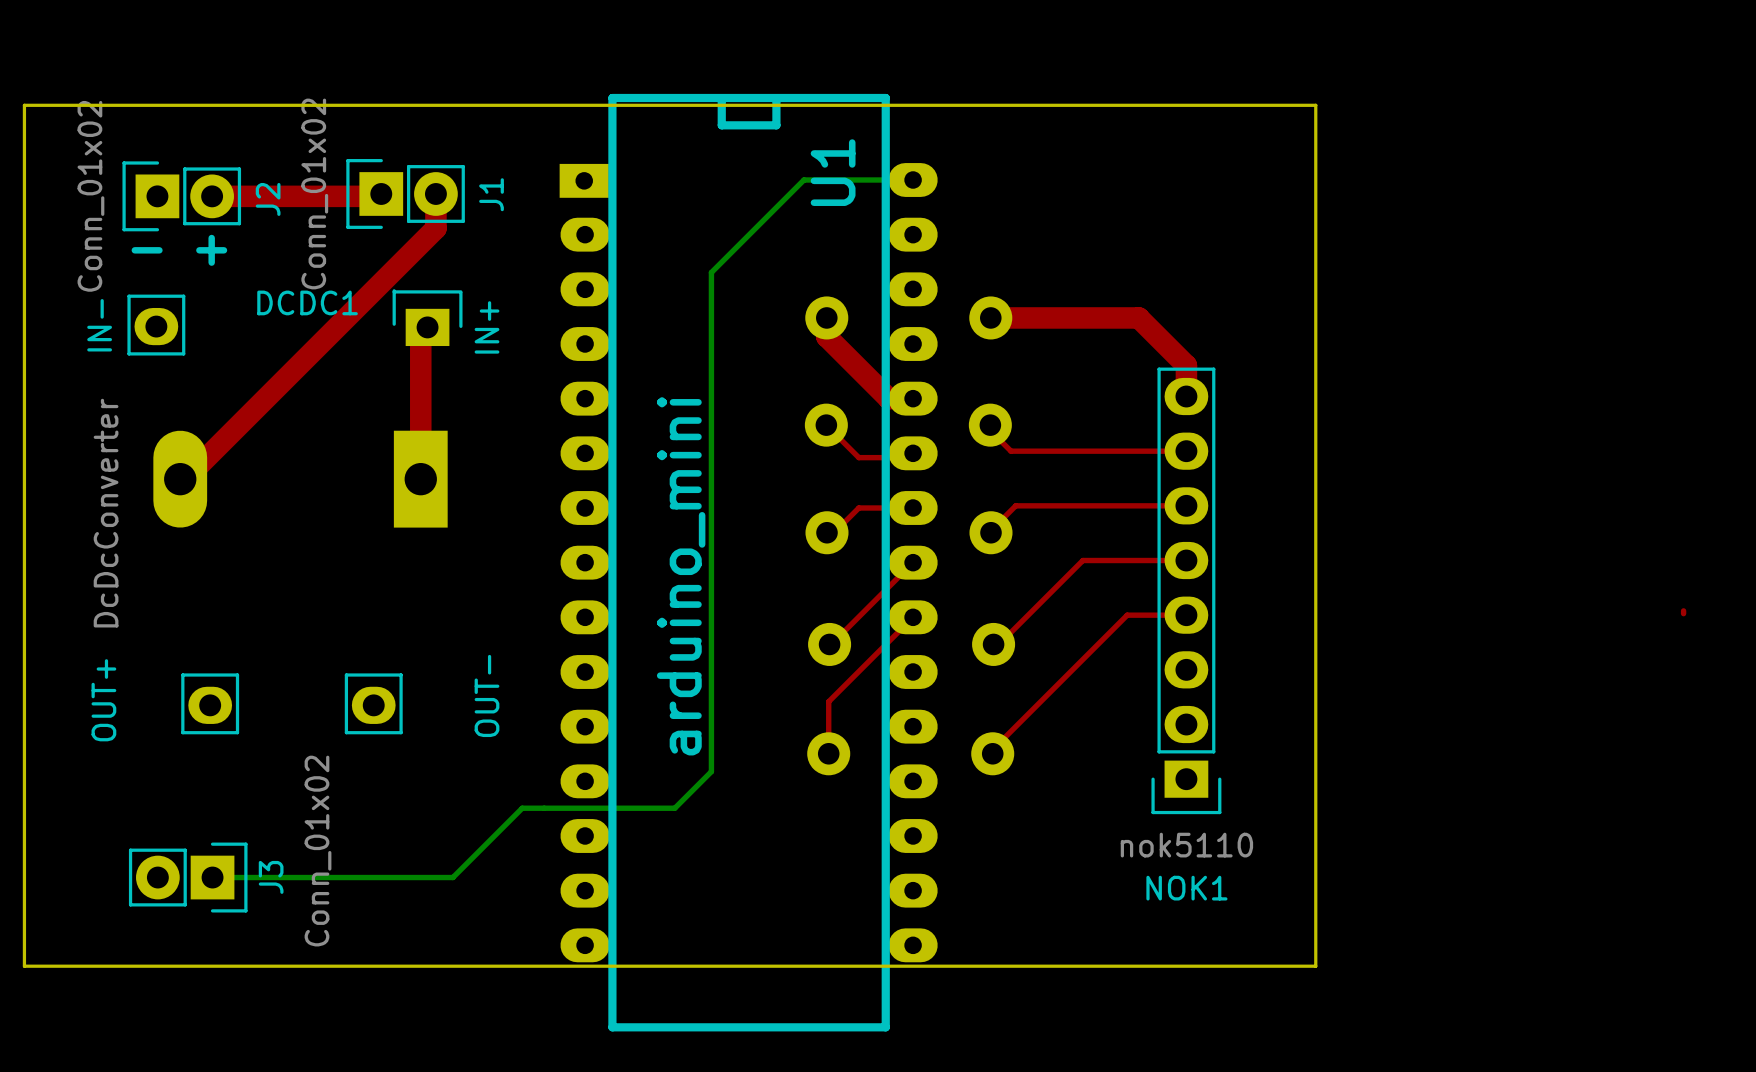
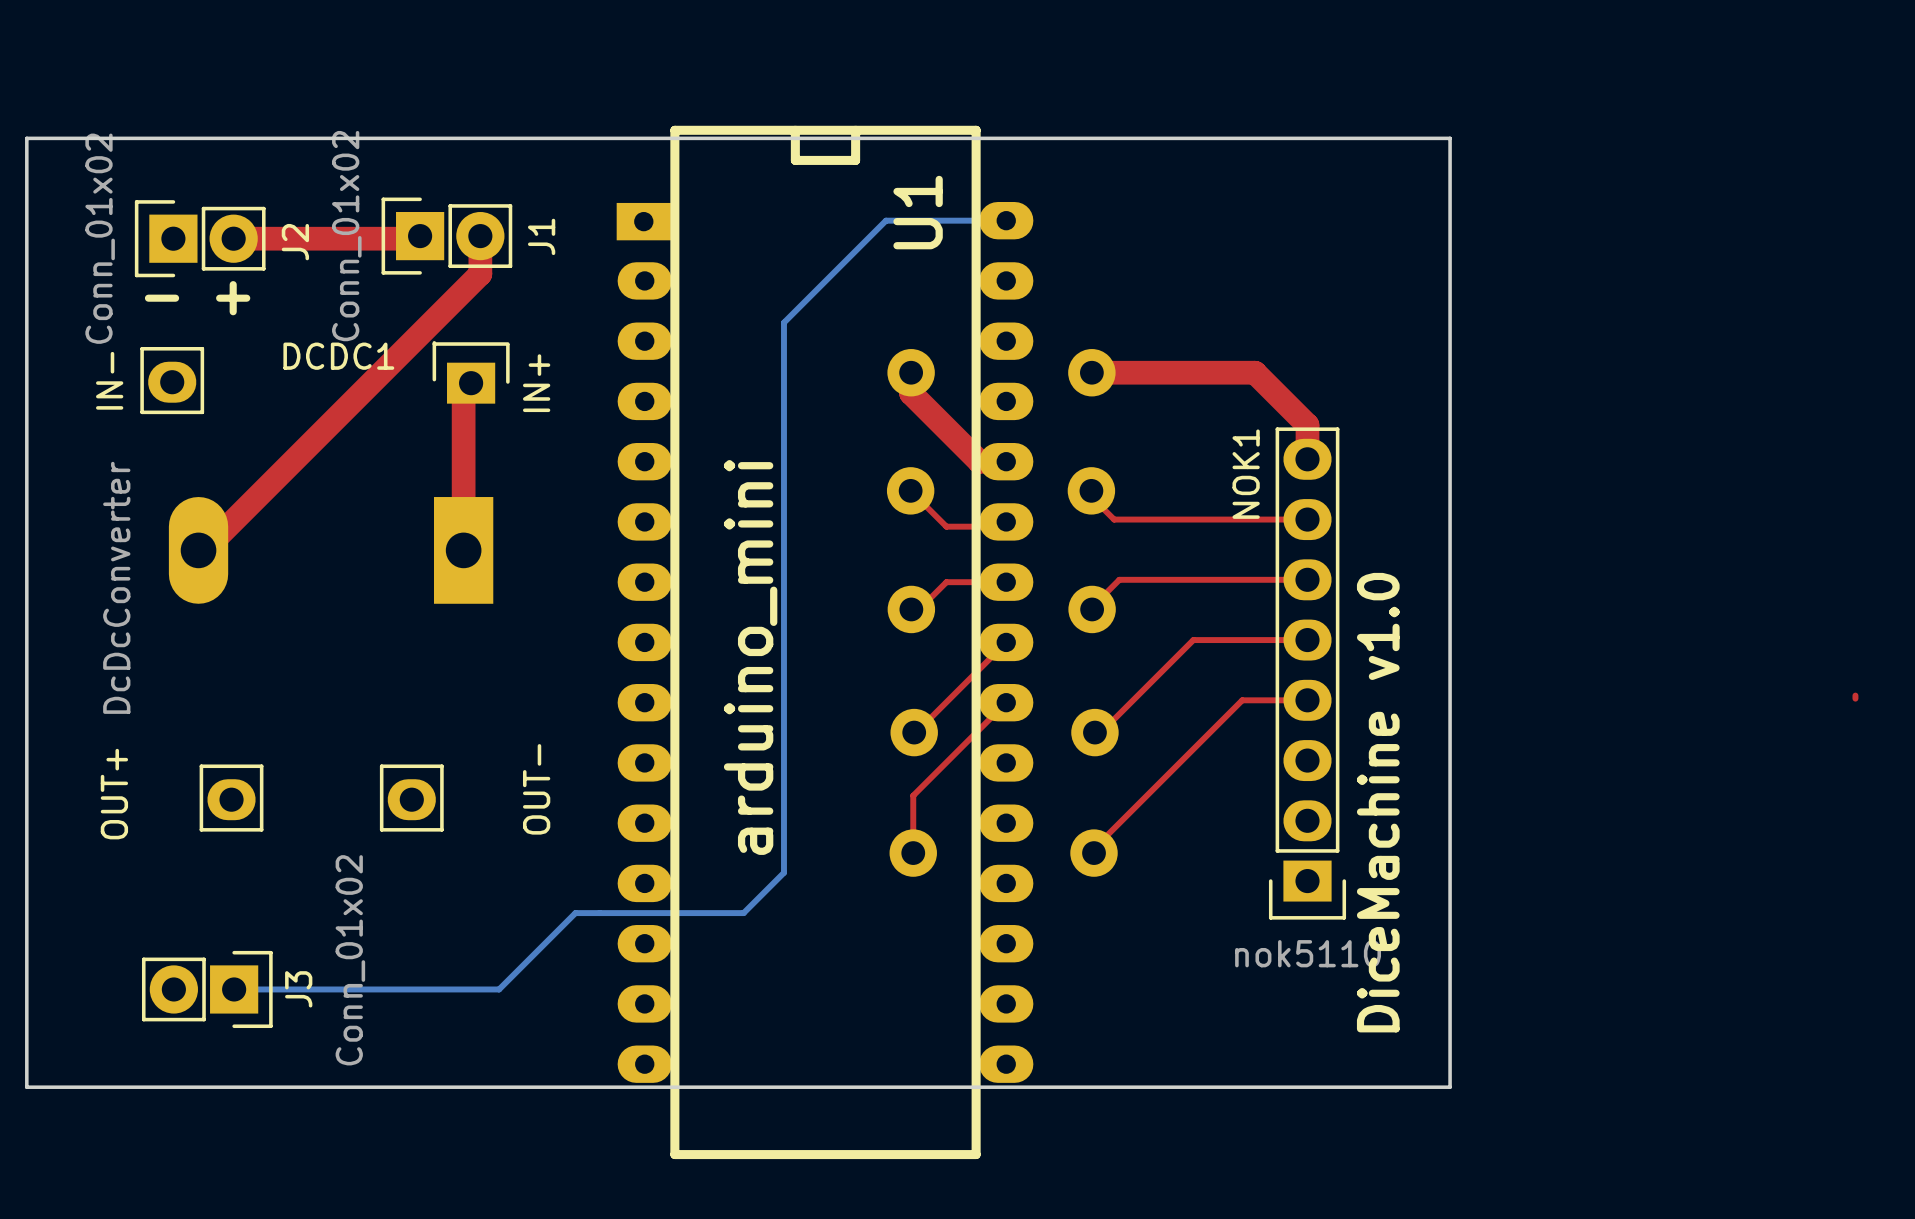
text: none -> DiceMachine v1.0 (1378, 802)
NOK1 name rotation: 0° (1186, 888) -> 90° counterclockwise (1246, 474)
NOK1 name position: NOK1 (1186, 888) -> NOK1 (1246, 474)

